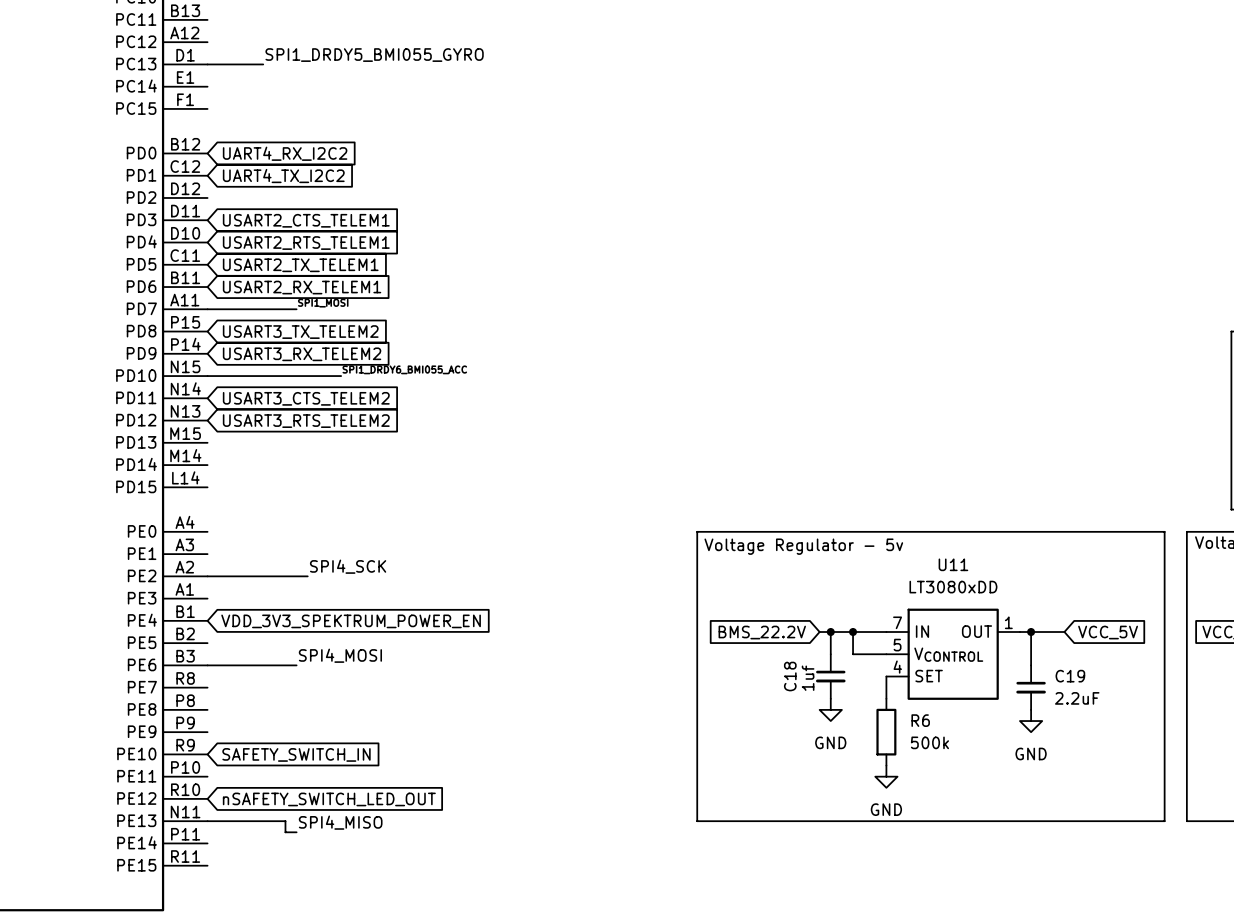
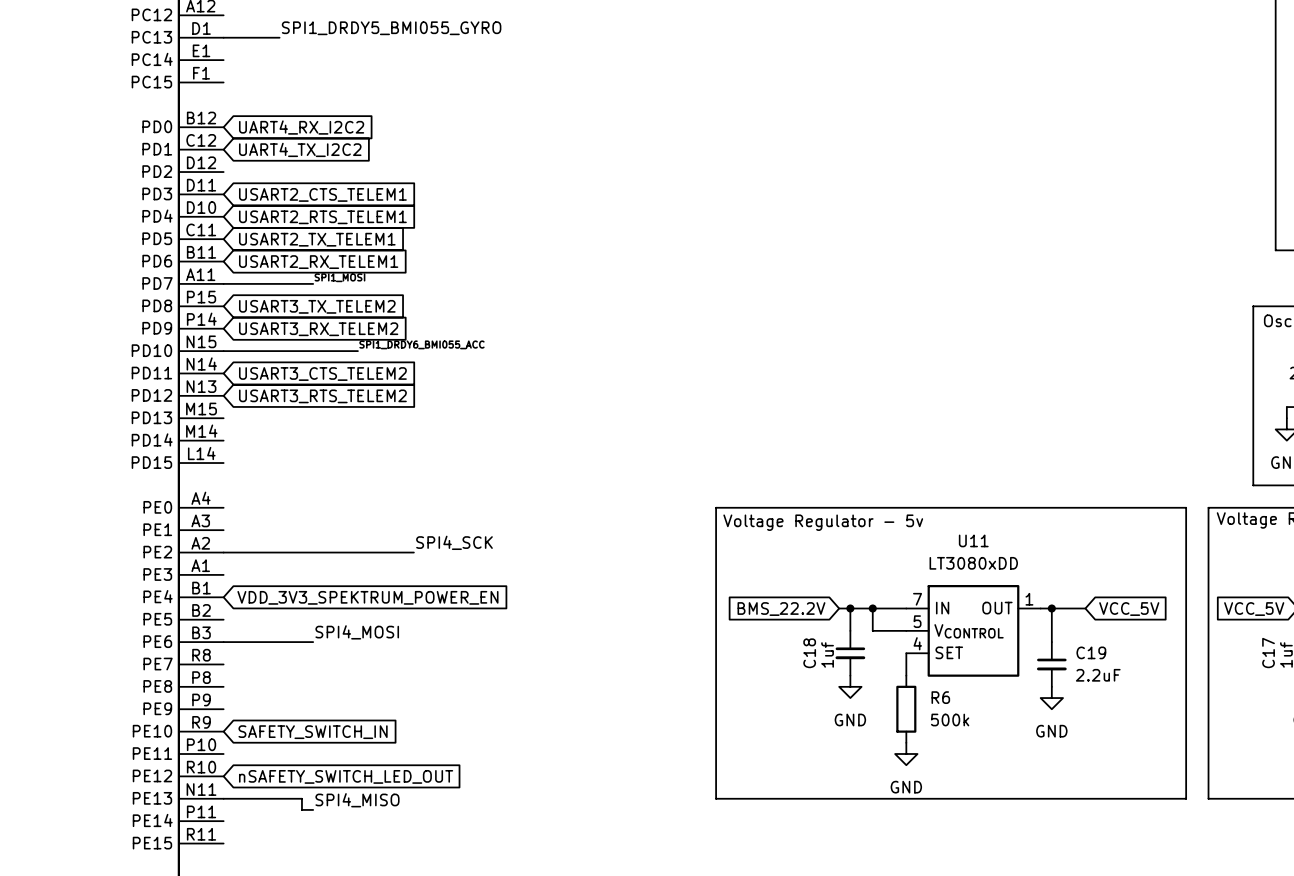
label position: SPI4_SCK (348, 566) -> SPI4_SCK (454, 542)
wire: none -> (324, 552) (413, 552)

